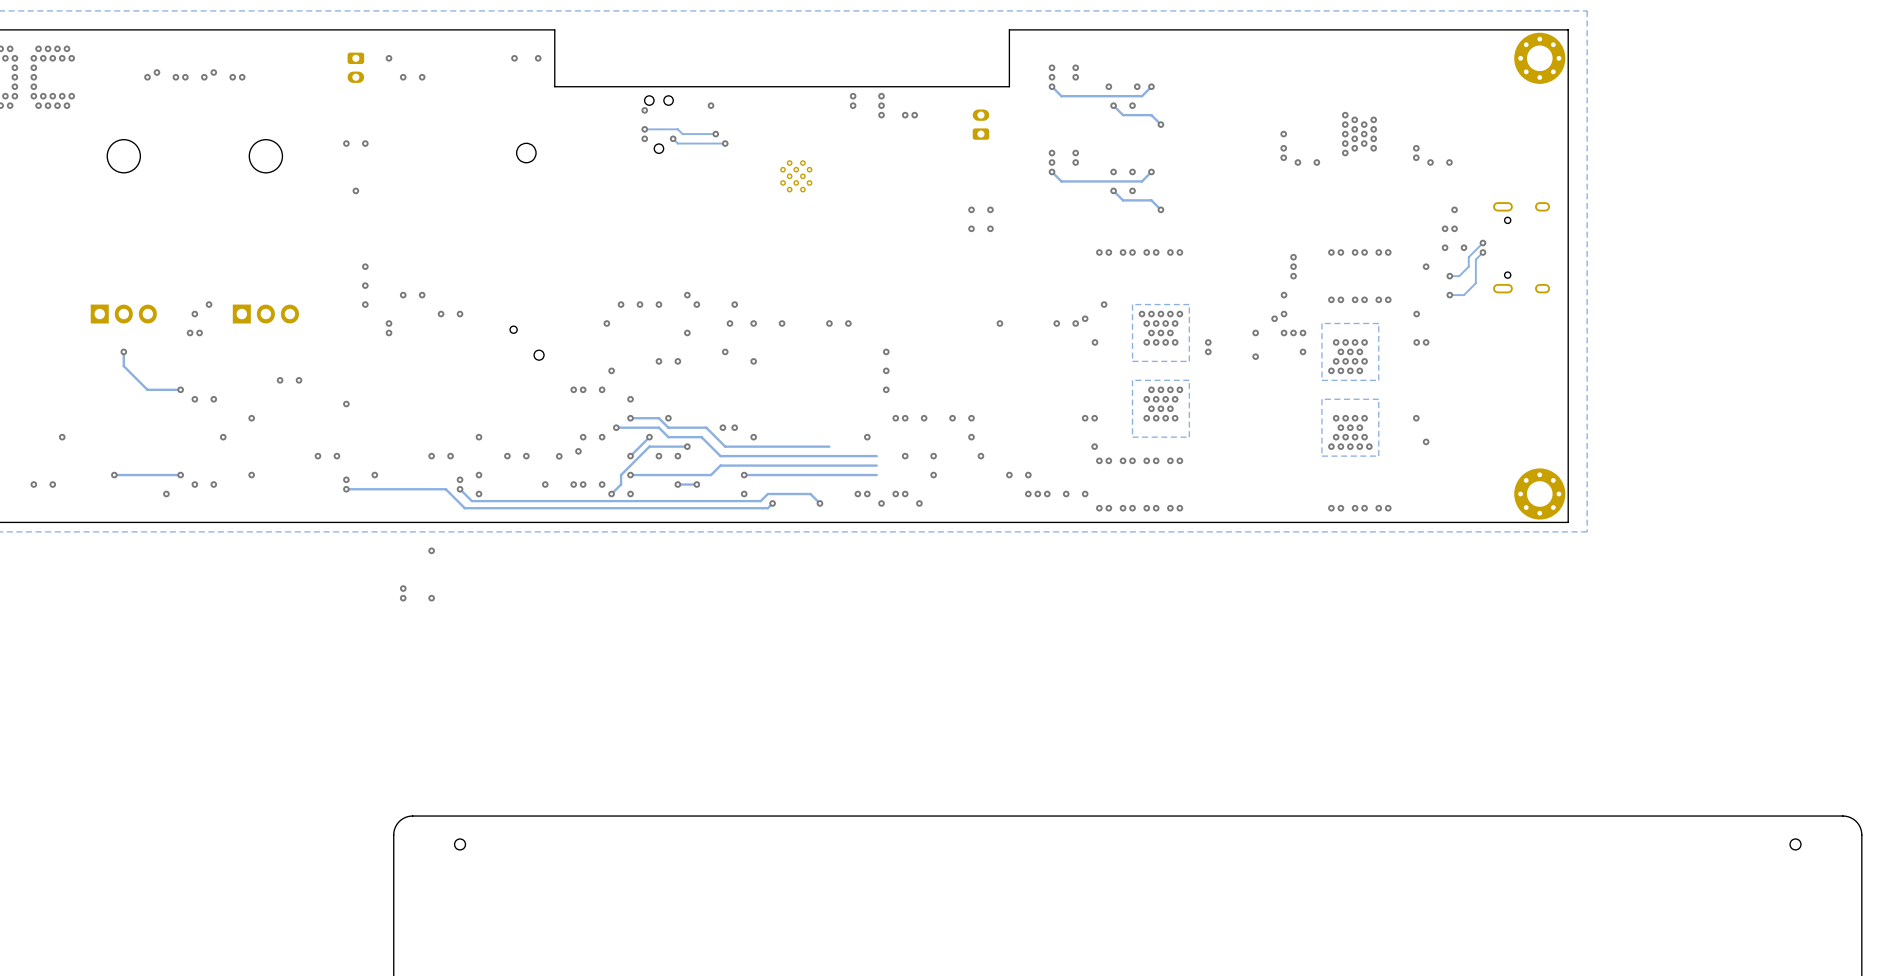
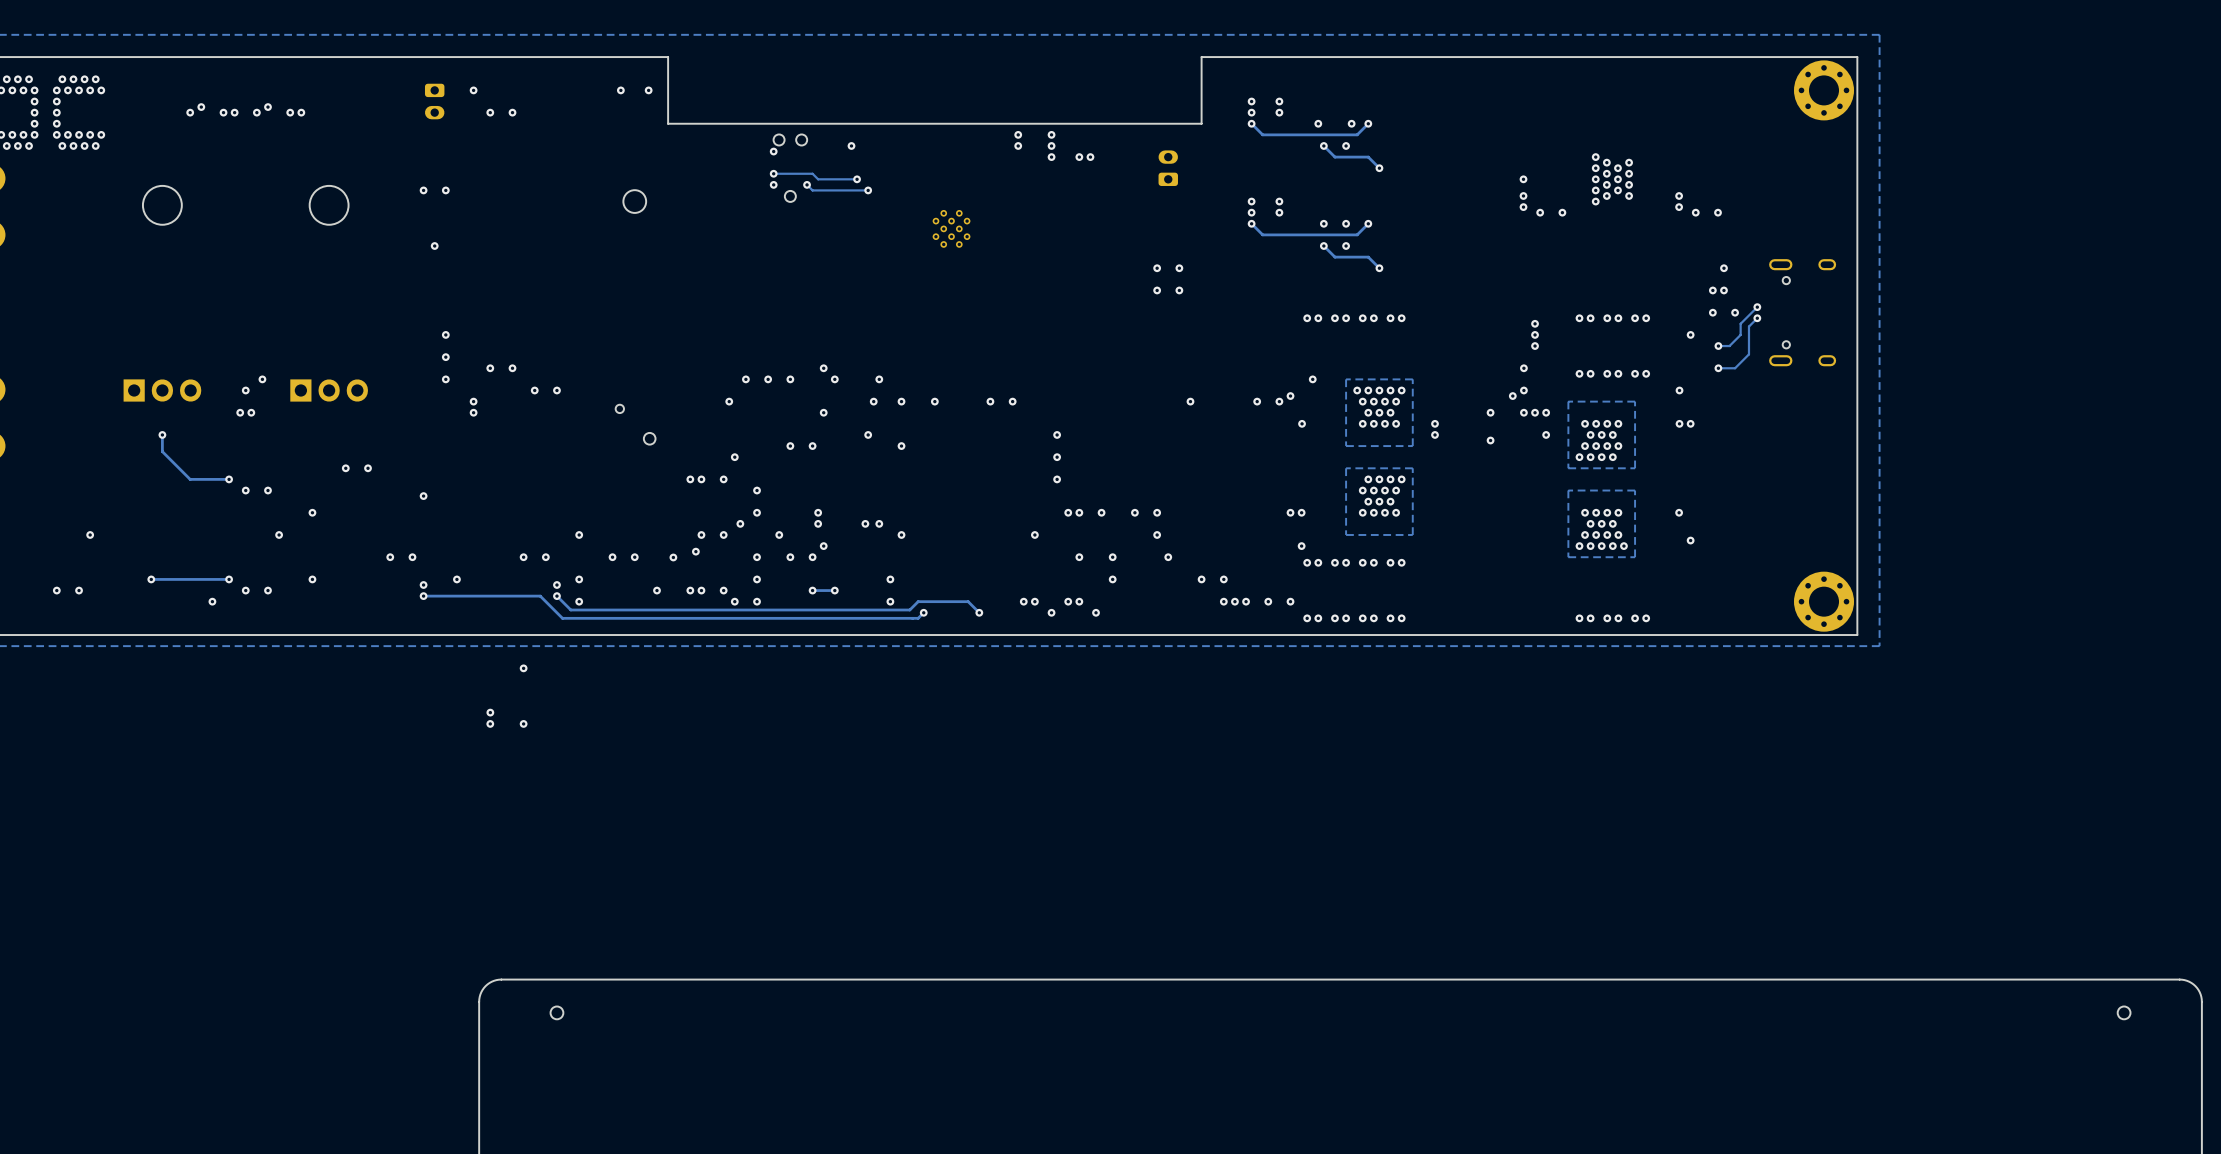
track: (630, 418) (658, 418) (668, 427) (706, 427) (725, 446) (829, 446) -> none
via: (668, 418) -> none
via: none -> (818, 512)
track: (616, 427) (658, 427) (668, 437) (701, 437) (720, 456) (876, 456) -> none
via: none -> (818, 523)
track: (649, 437) (630, 456) -> none
track: (687, 446) (649, 446) (621, 475) (621, 484) (611, 493) -> none
track: (876, 465) (720, 465) (711, 475) (630, 475) -> none
track: (876, 475) (744, 475) -> none

